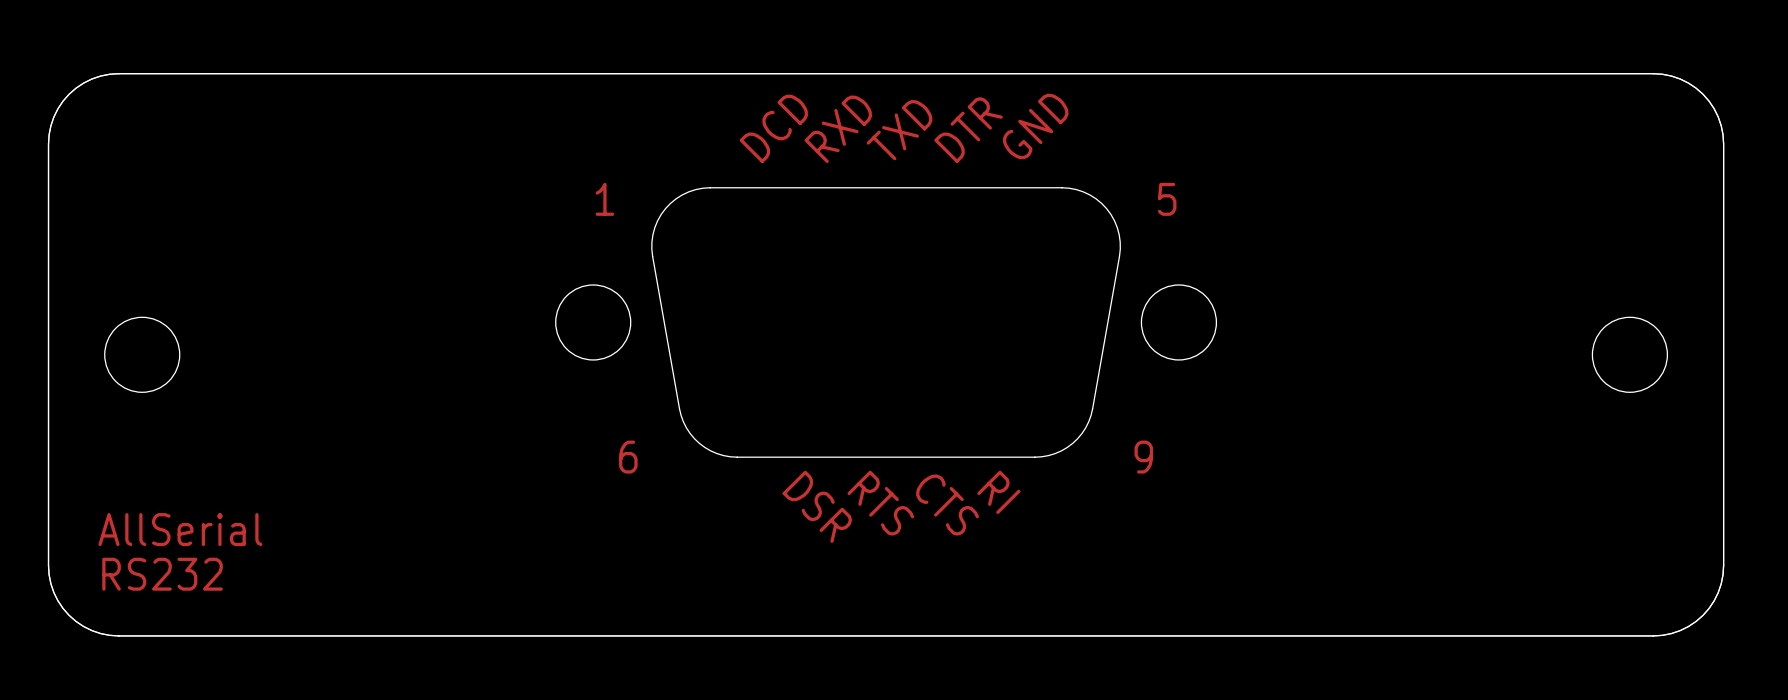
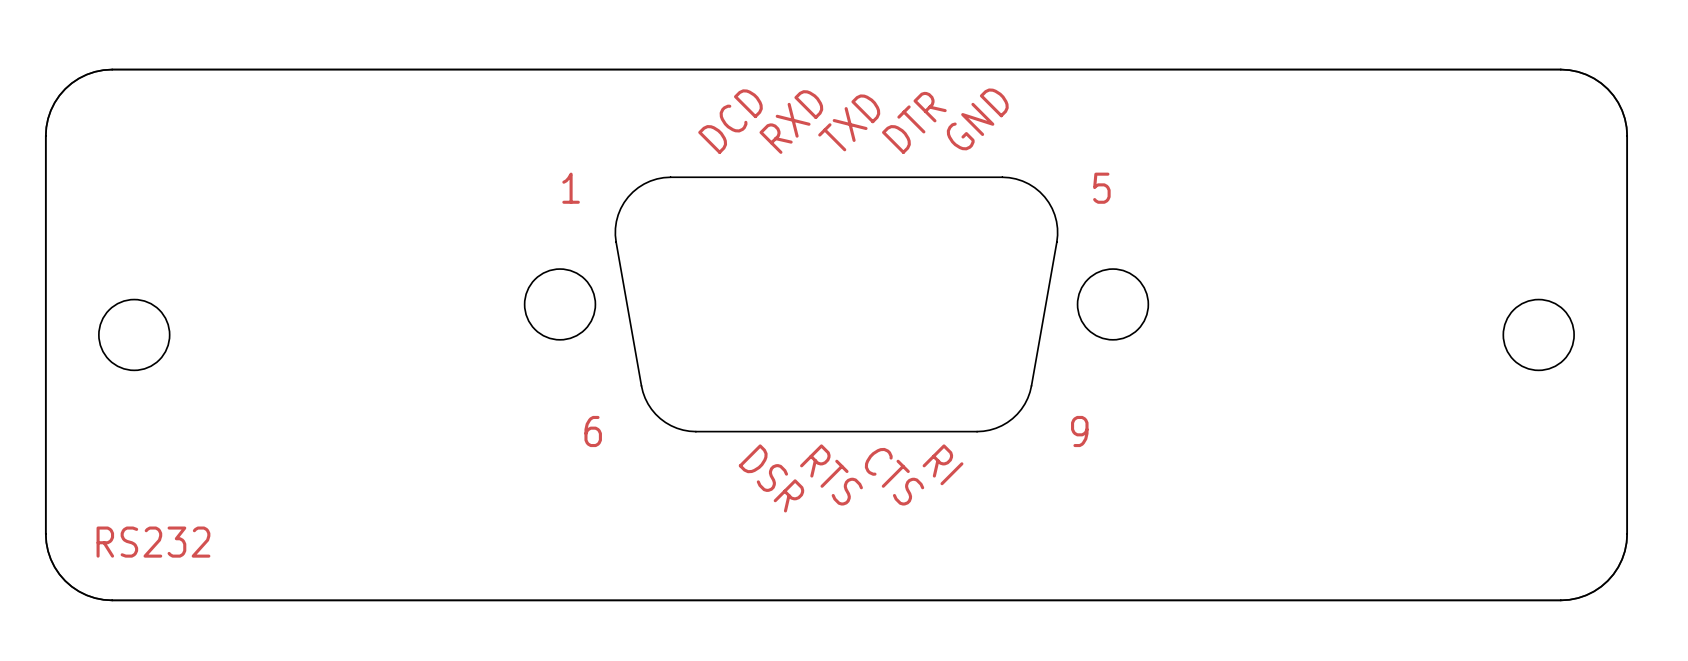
text: AllSerial (180, 529) -> none

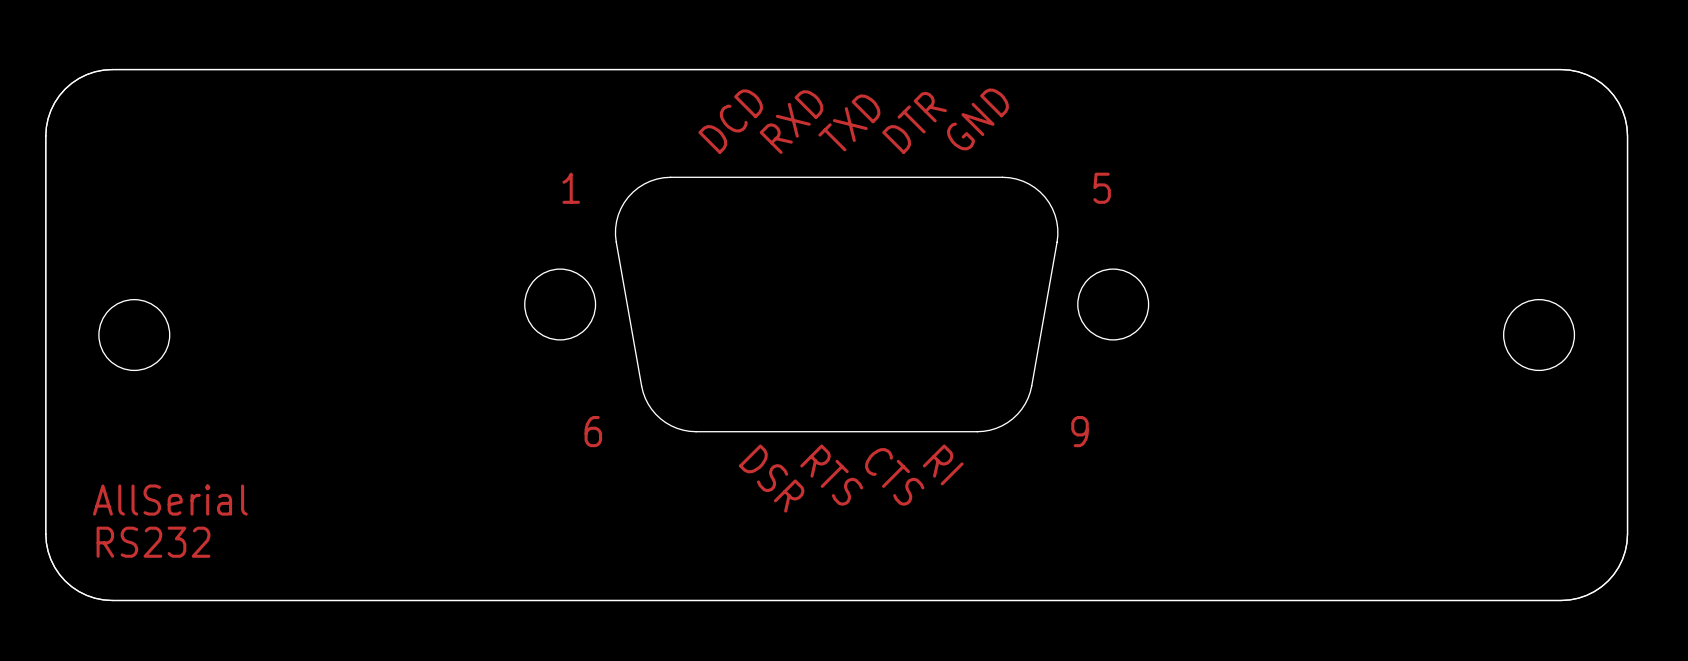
text: none -> AllSerial (170, 500)

